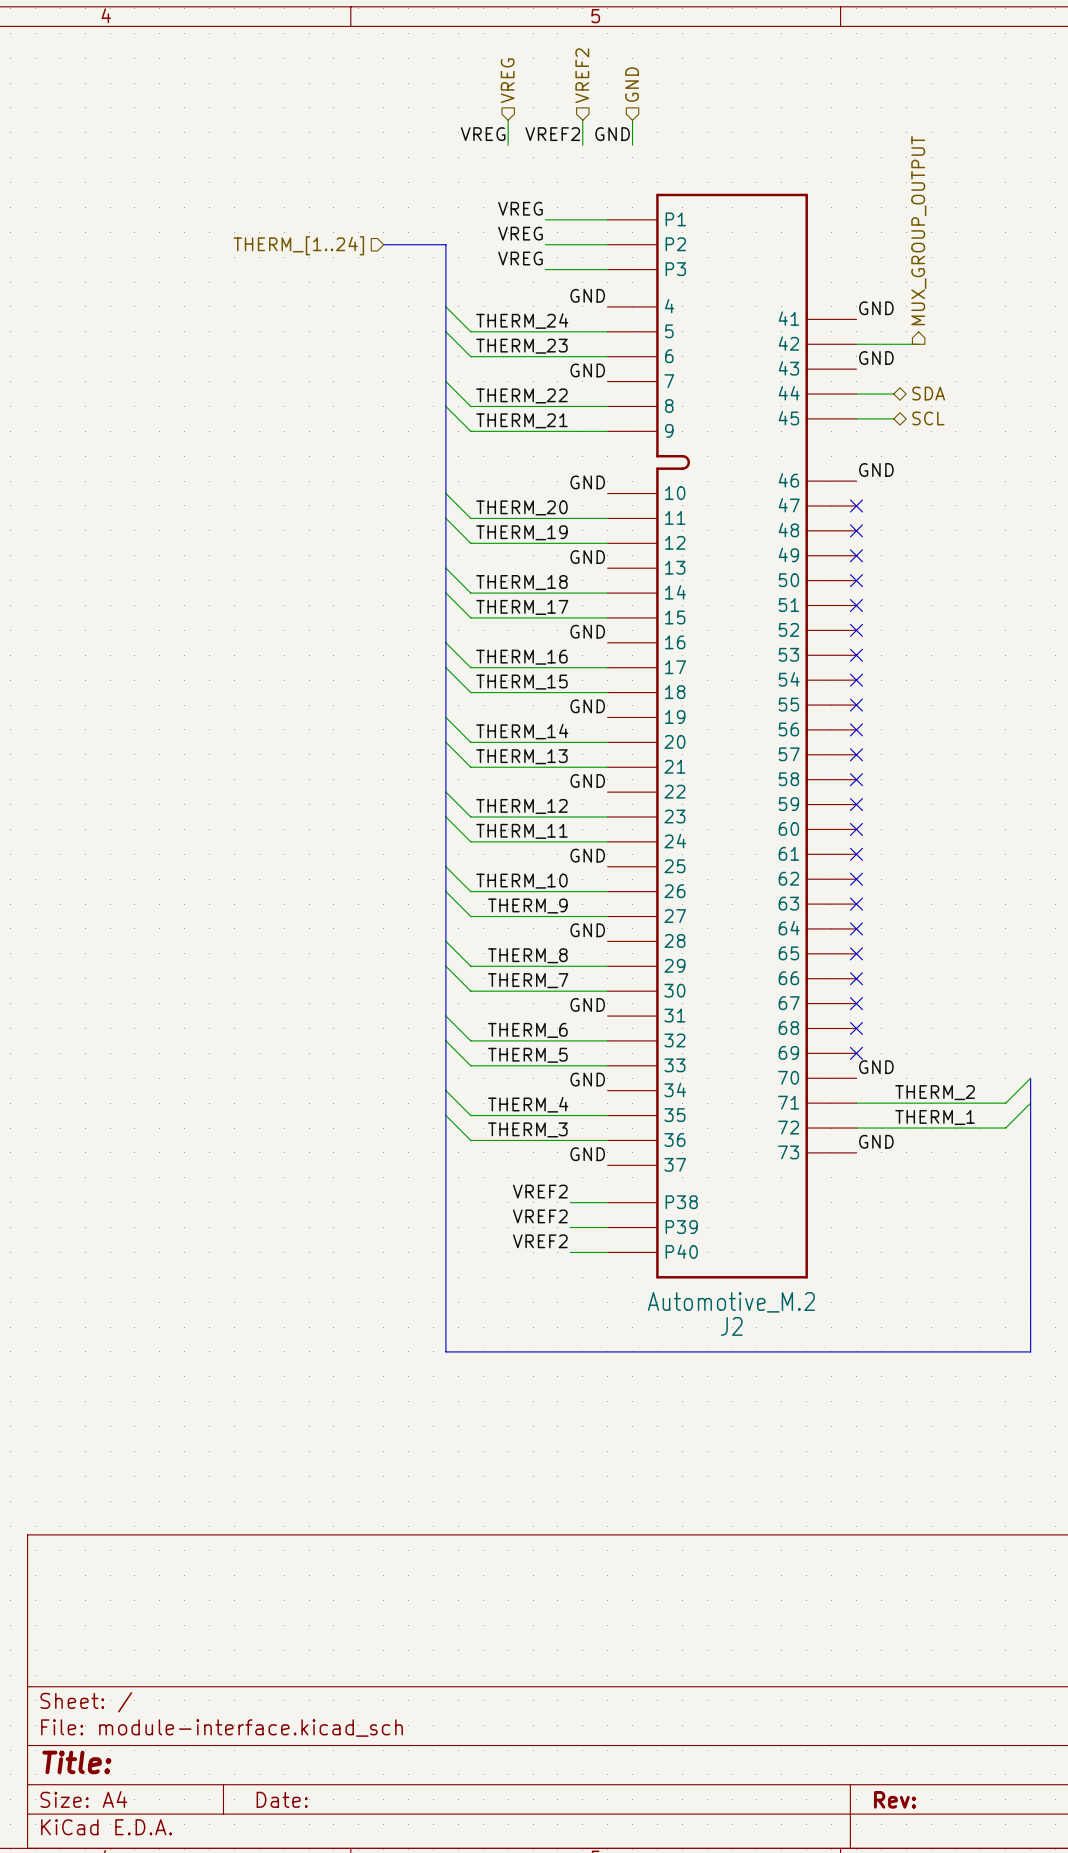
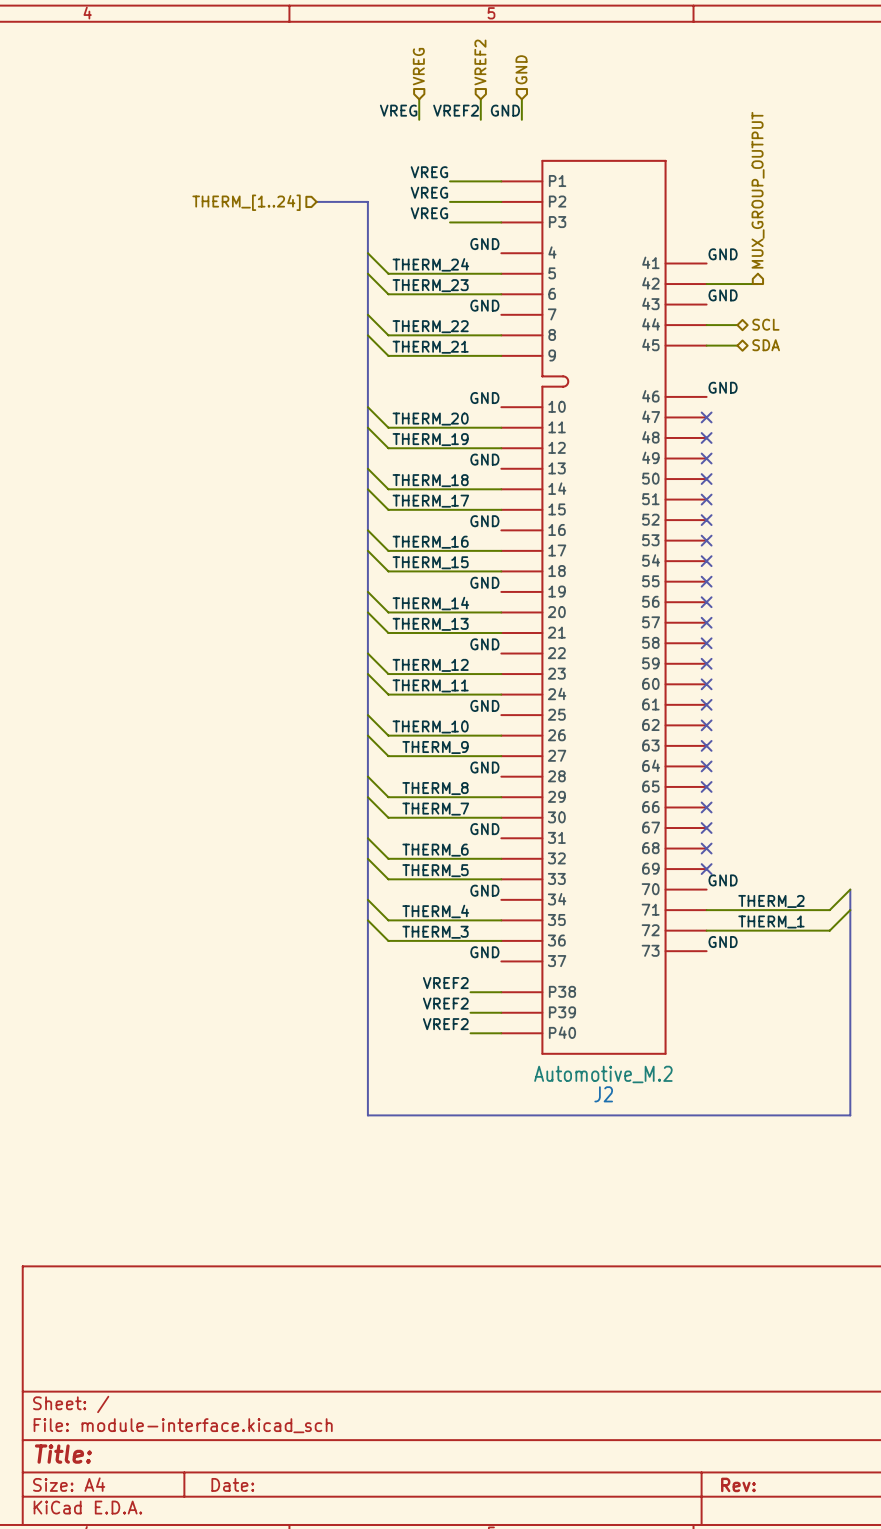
hierarchical label: SDA (928, 393) -> SCL (765, 324)
hierarchical label: SCL (928, 418) -> SDA (766, 345)

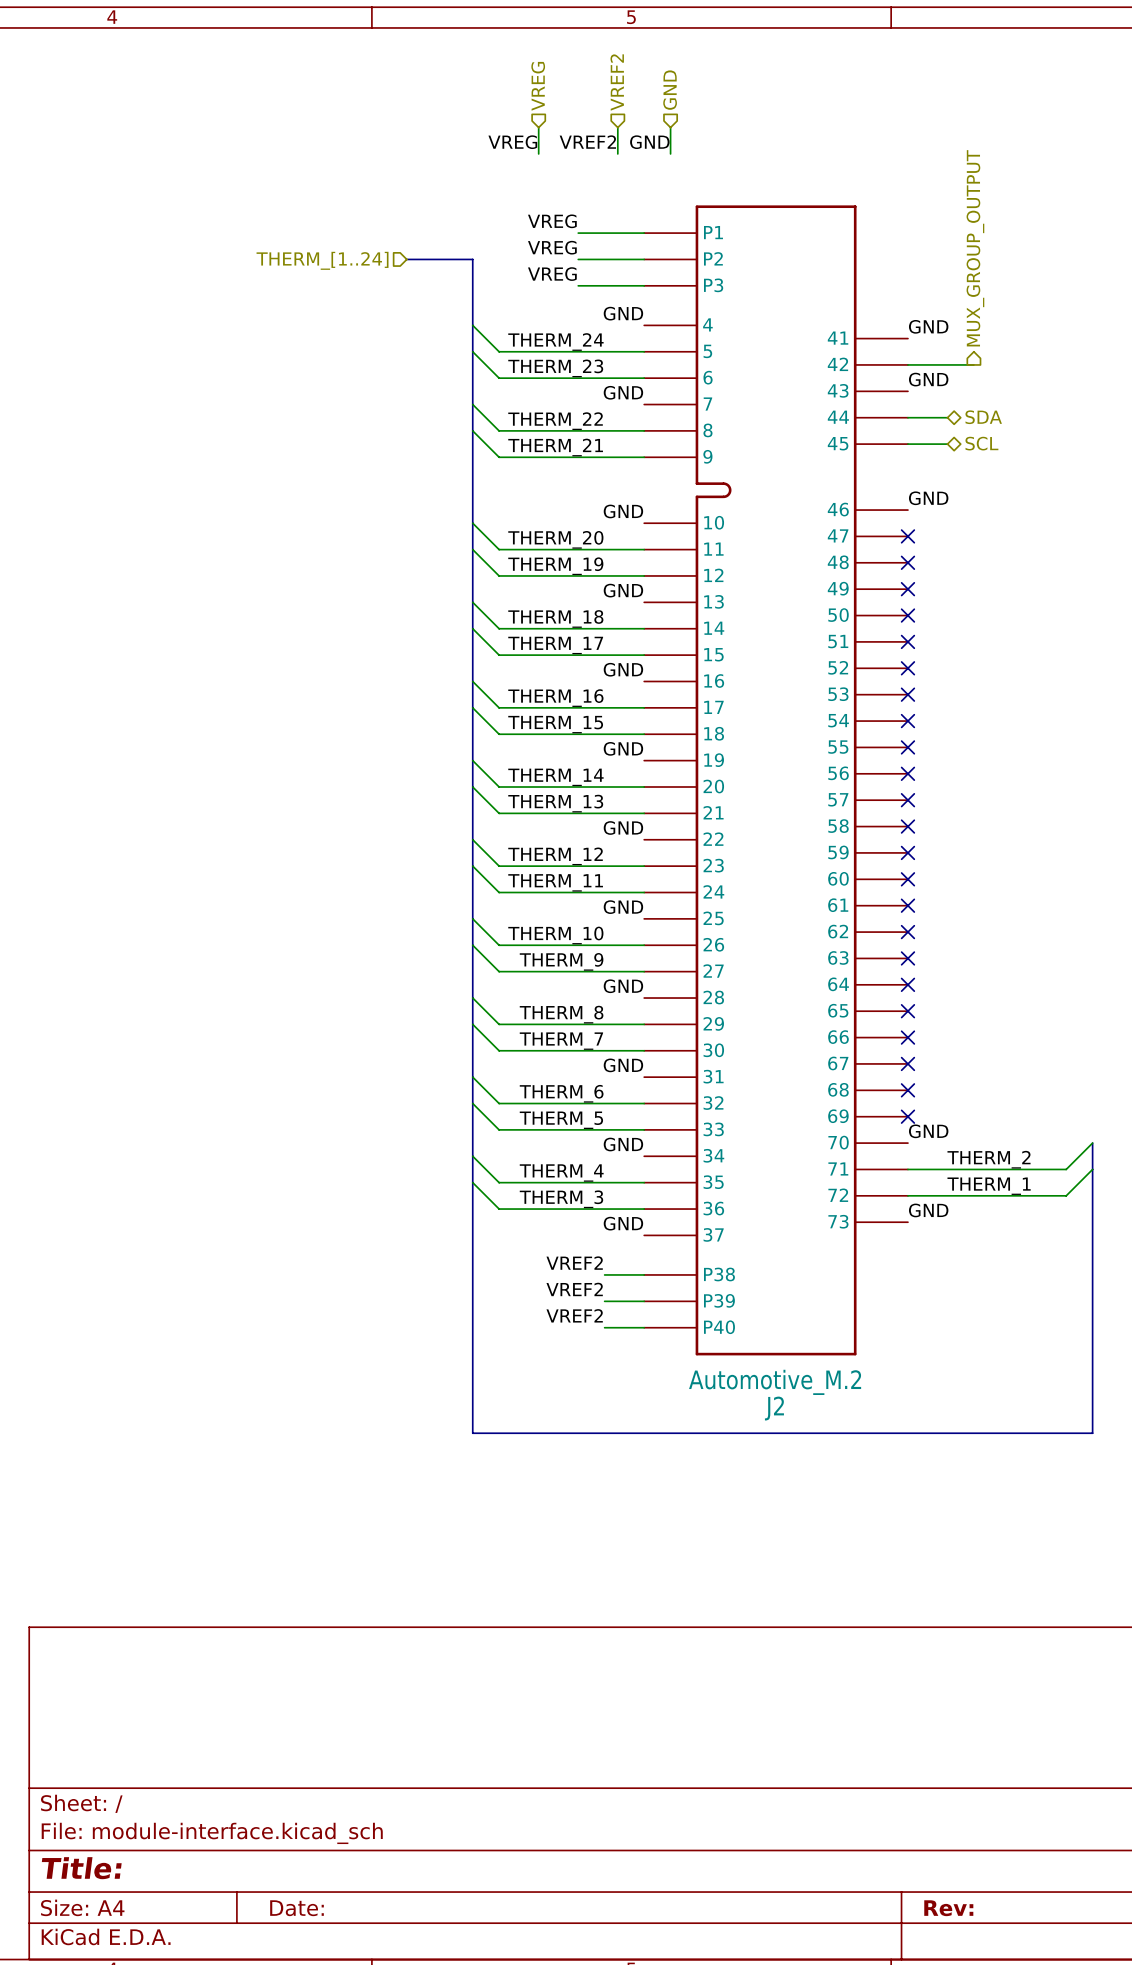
hierarchical label: SCL (765, 324) -> SDA (983, 417)
hierarchical label: SDA (766, 345) -> SCL (981, 443)

